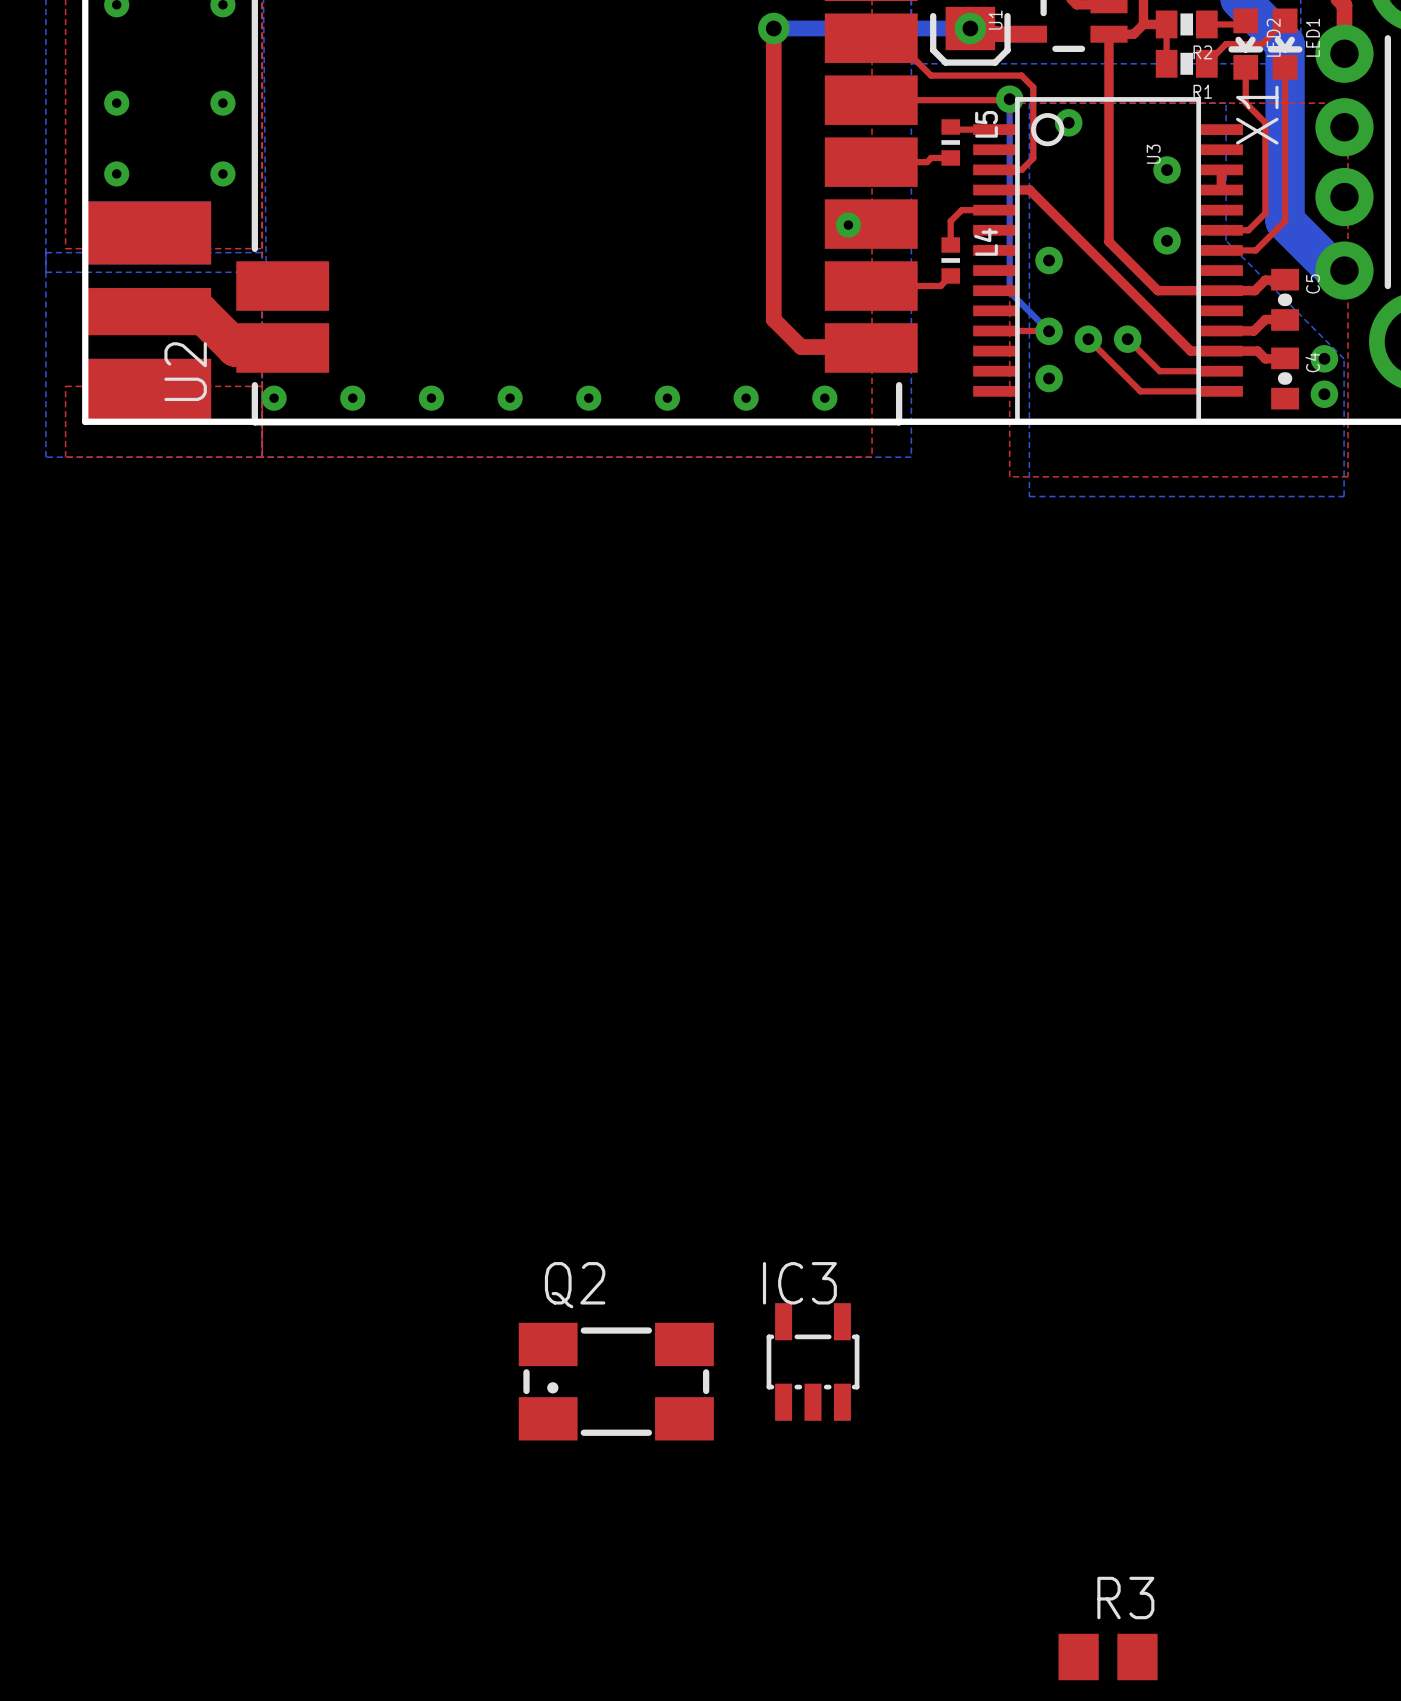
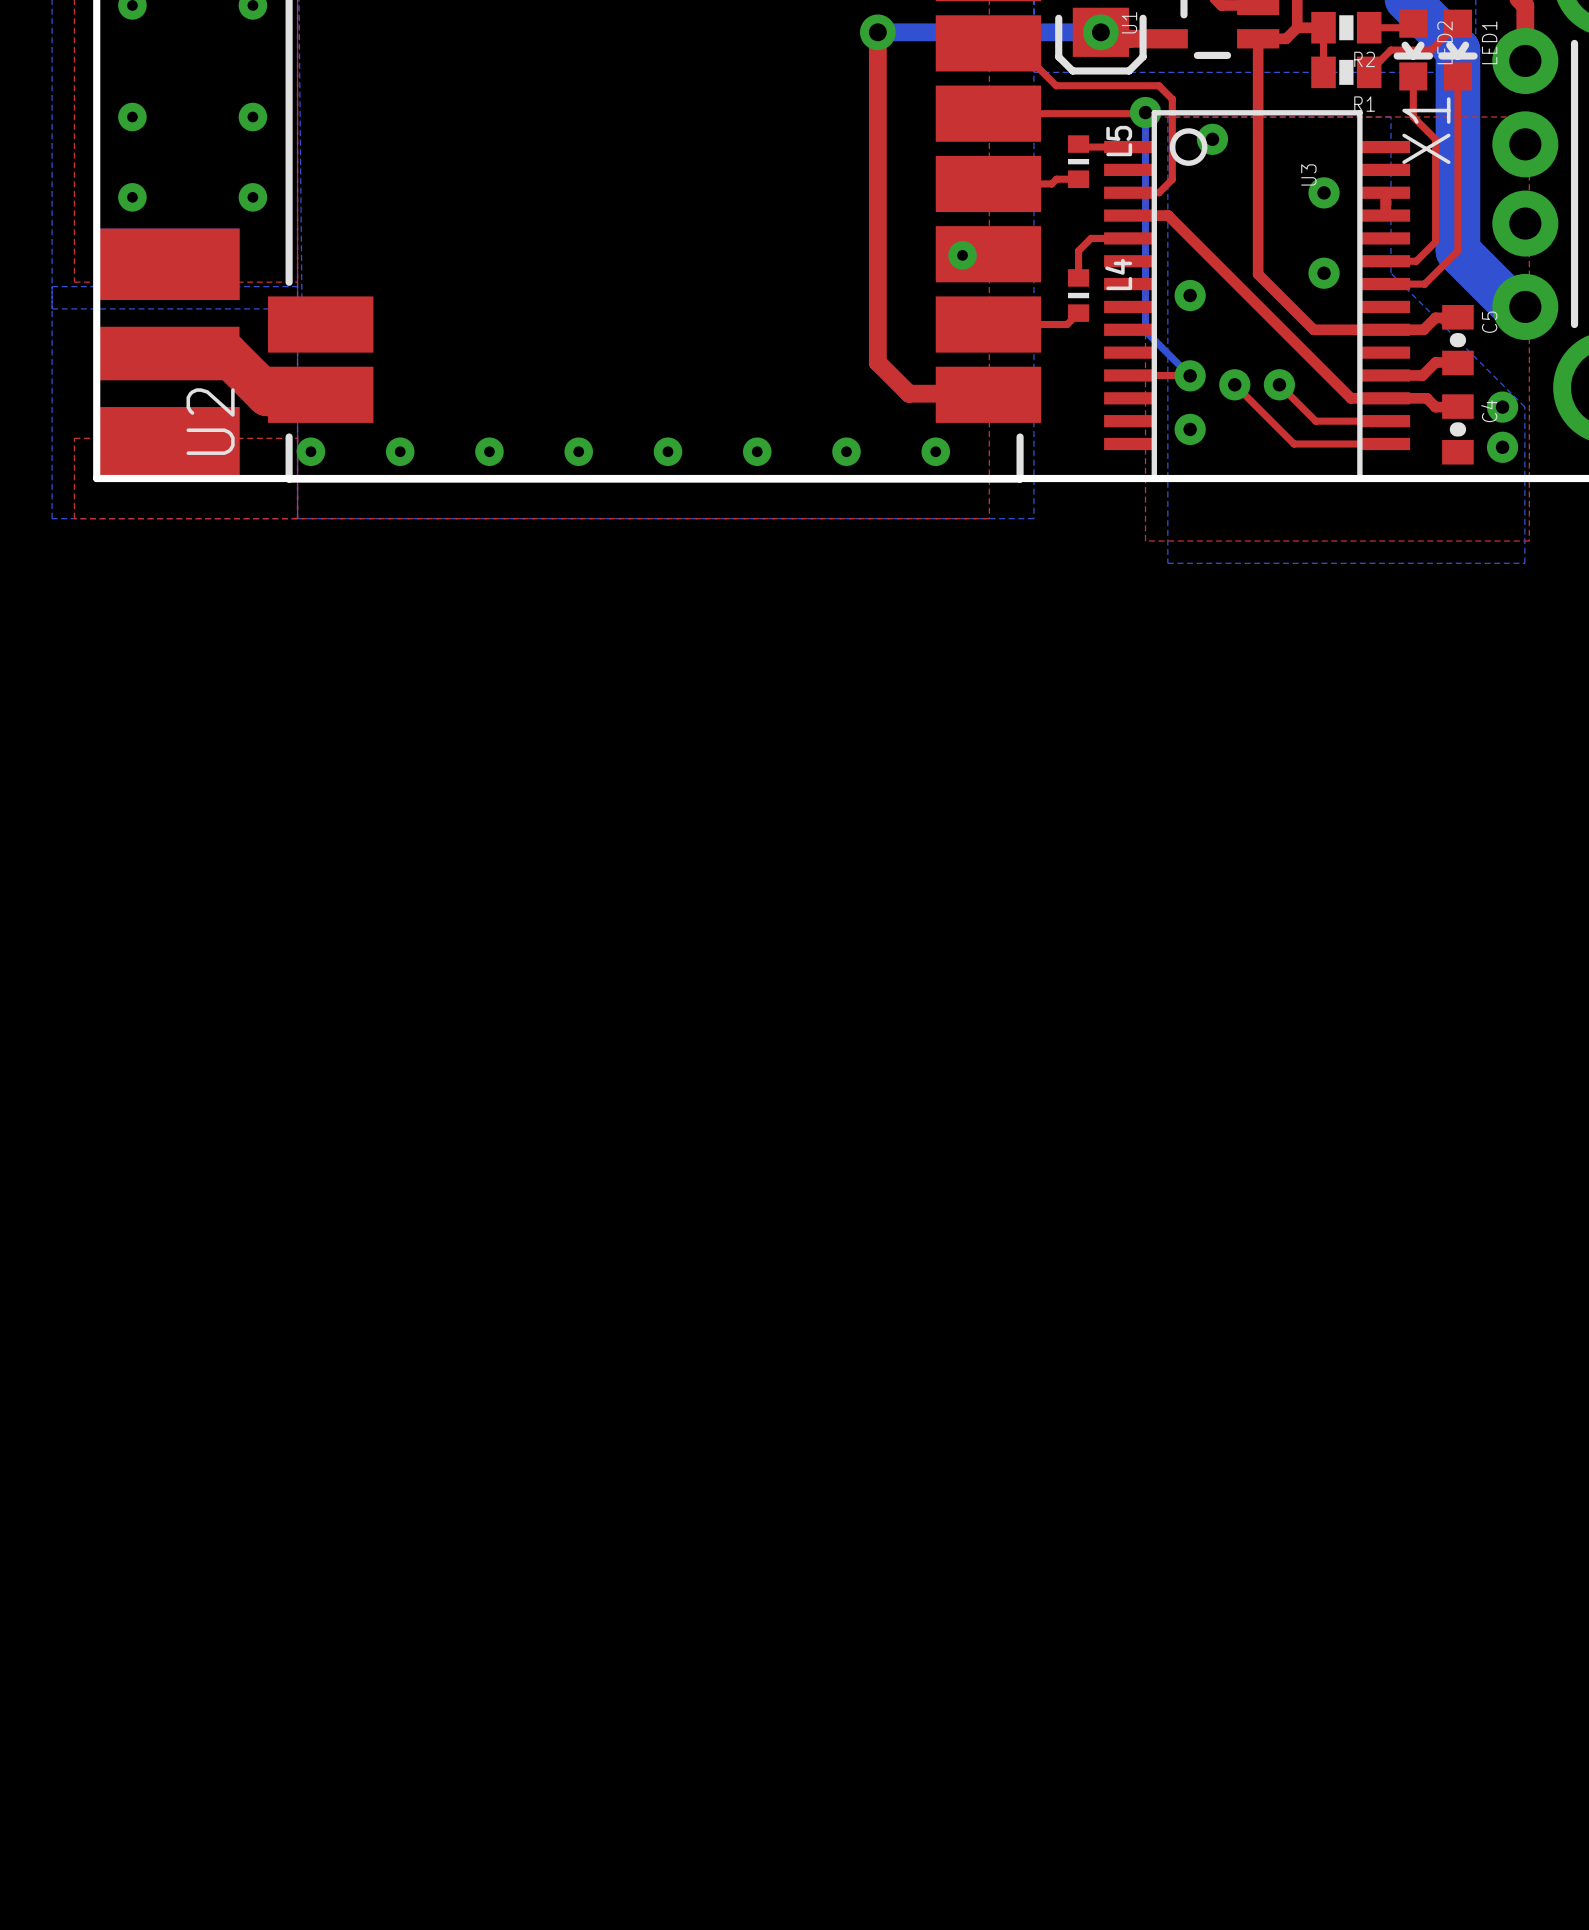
IC3: (813, 1361) -> none
Q2: (616, 1381) -> none
R3: (1108, 1657) -> none

